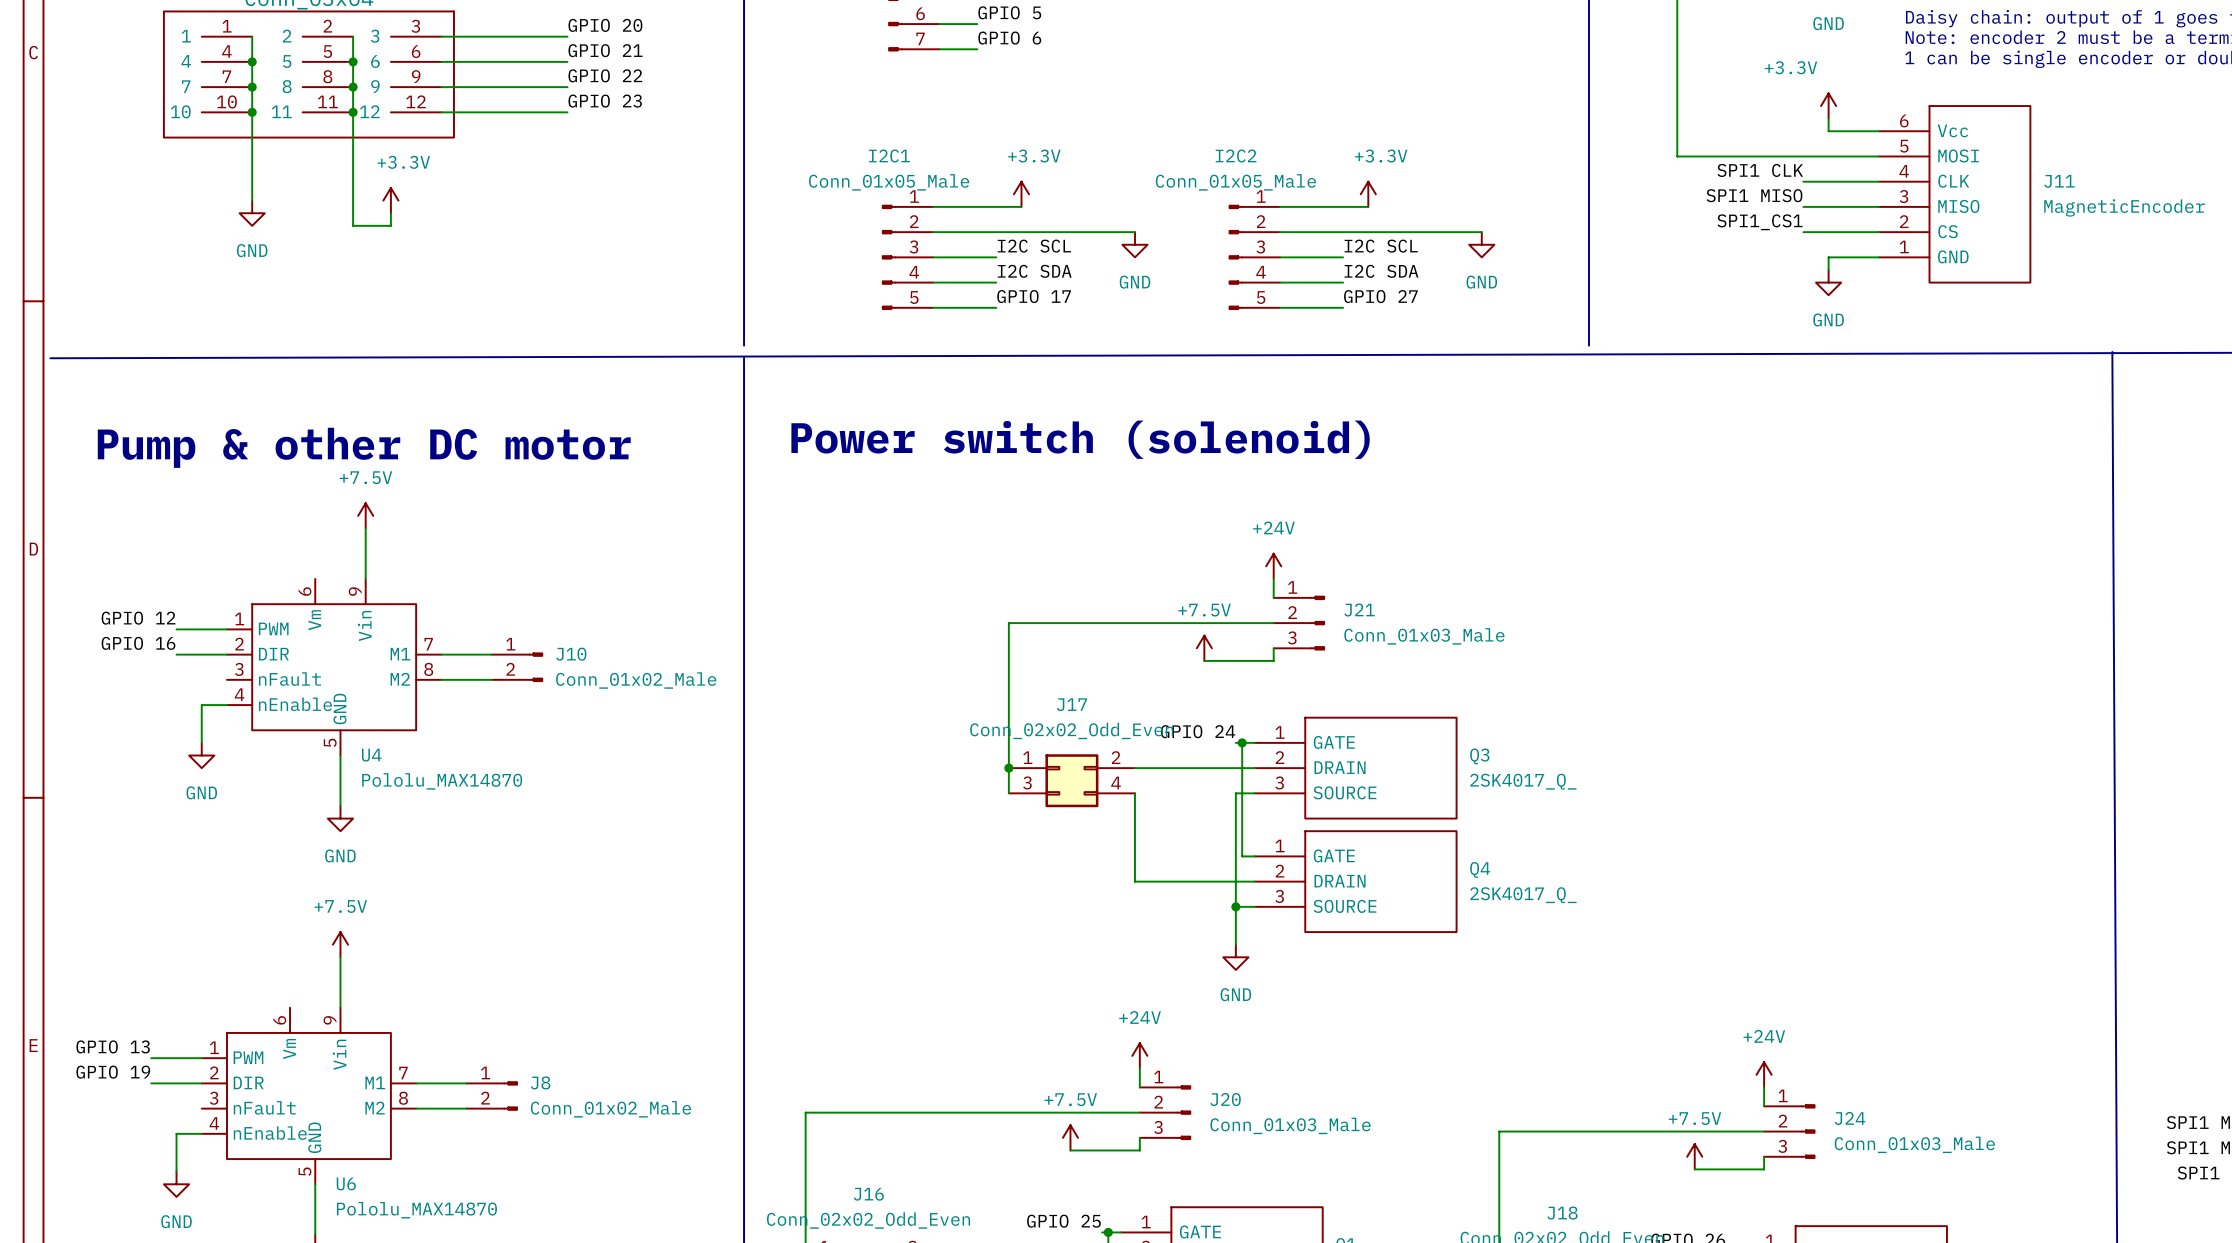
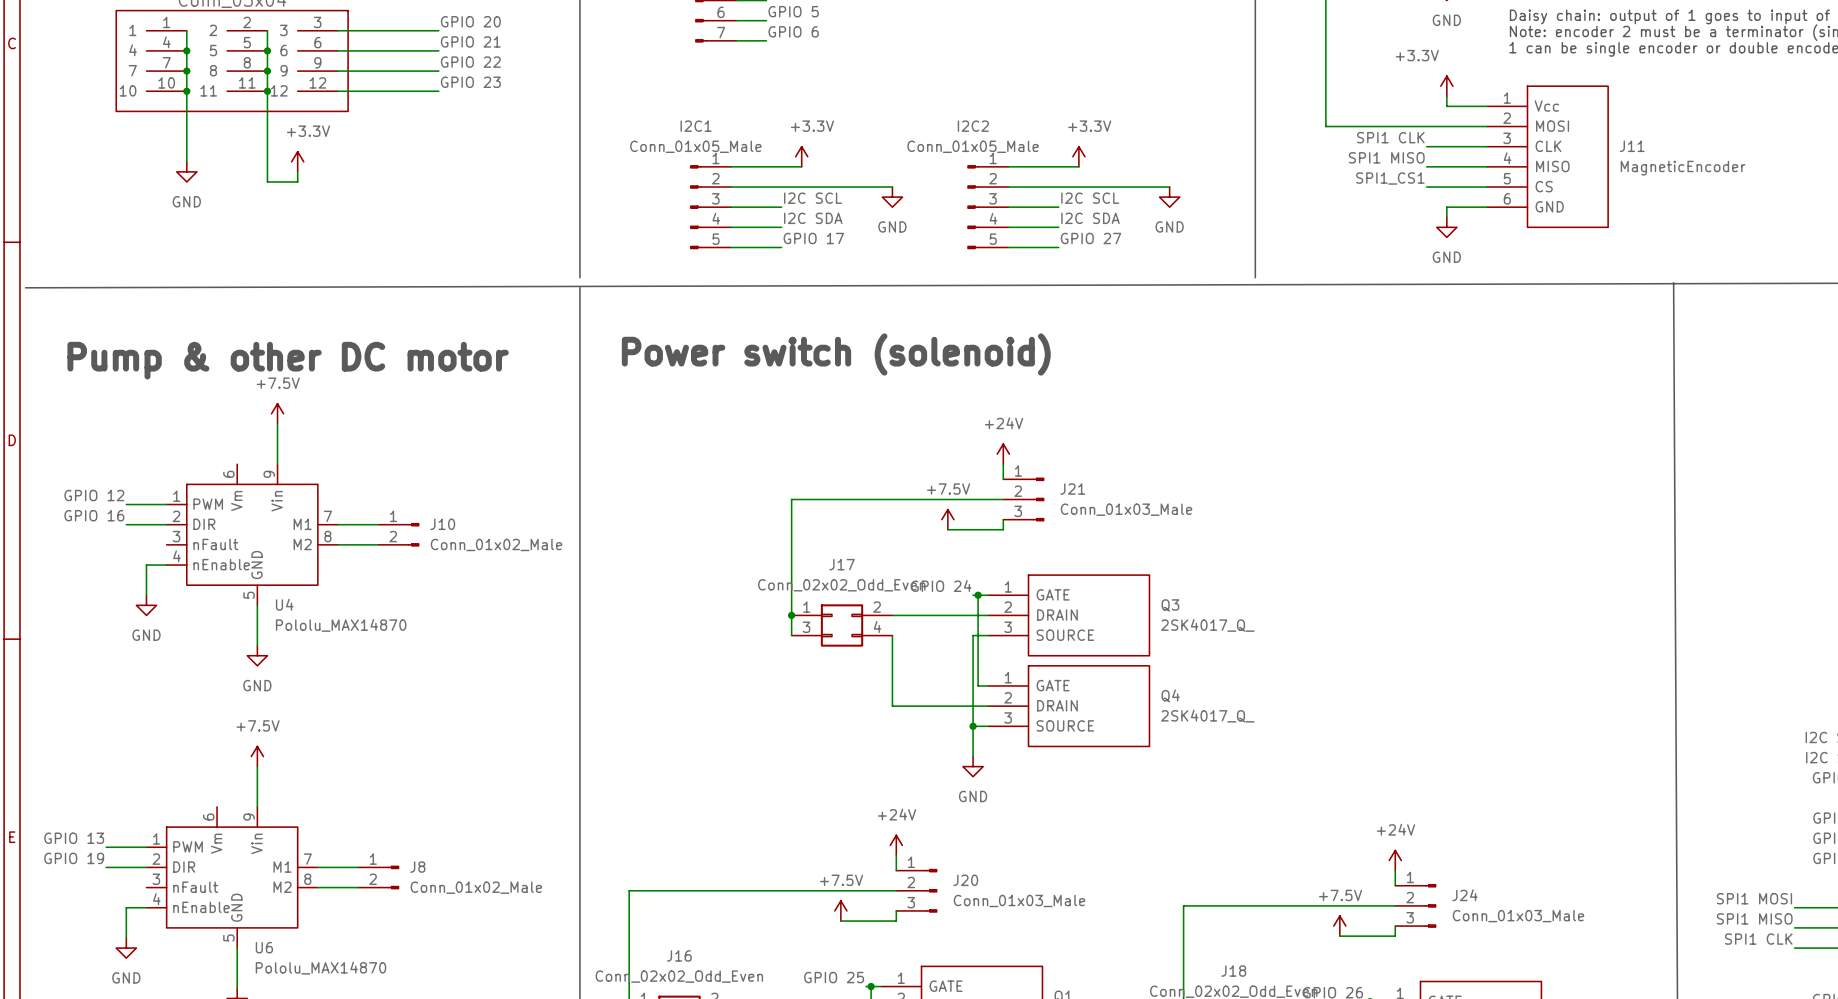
J11 pin number: 6 (1904, 120) -> 1 (1507, 98)
J11 pin number: 5 (1904, 146) -> 2 (1507, 118)
J11 pin number: 4 (1904, 171) -> 3 (1507, 138)
J11 pin number: 3 (1903, 196) -> 4 (1507, 158)
J11 pin number: 2 (1904, 221) -> 5 (1507, 178)
J11 pin number: 1 (1904, 246) -> 6 (1507, 198)

